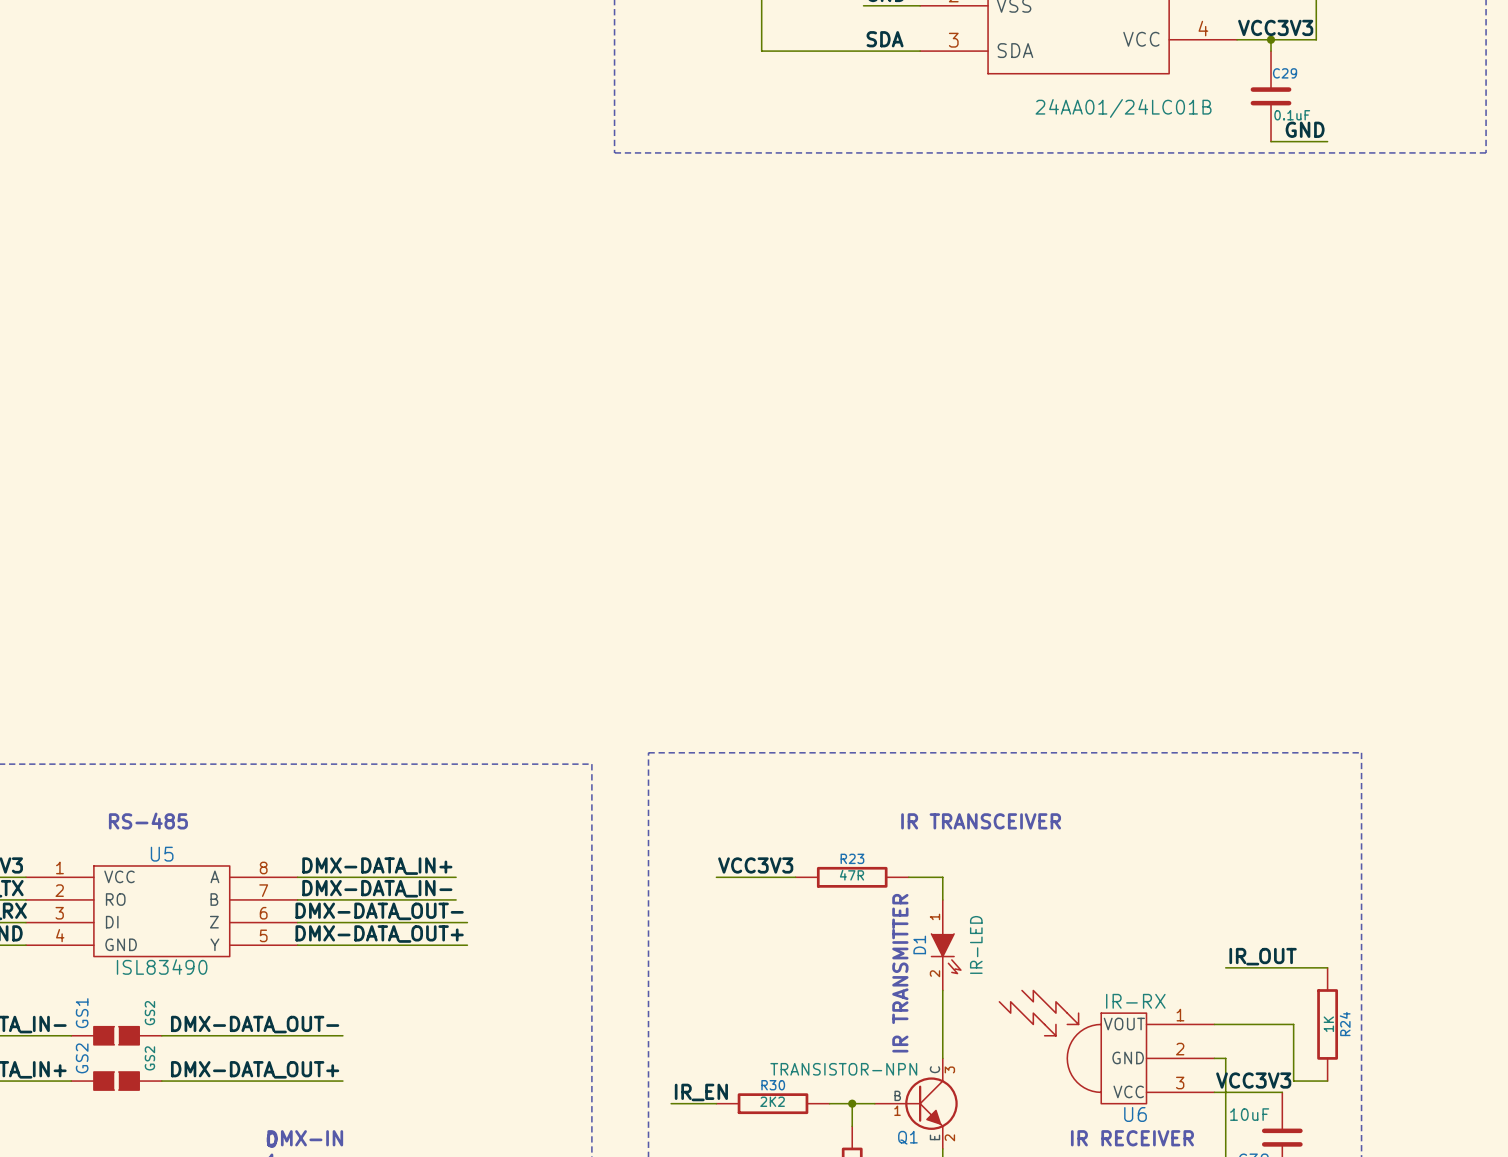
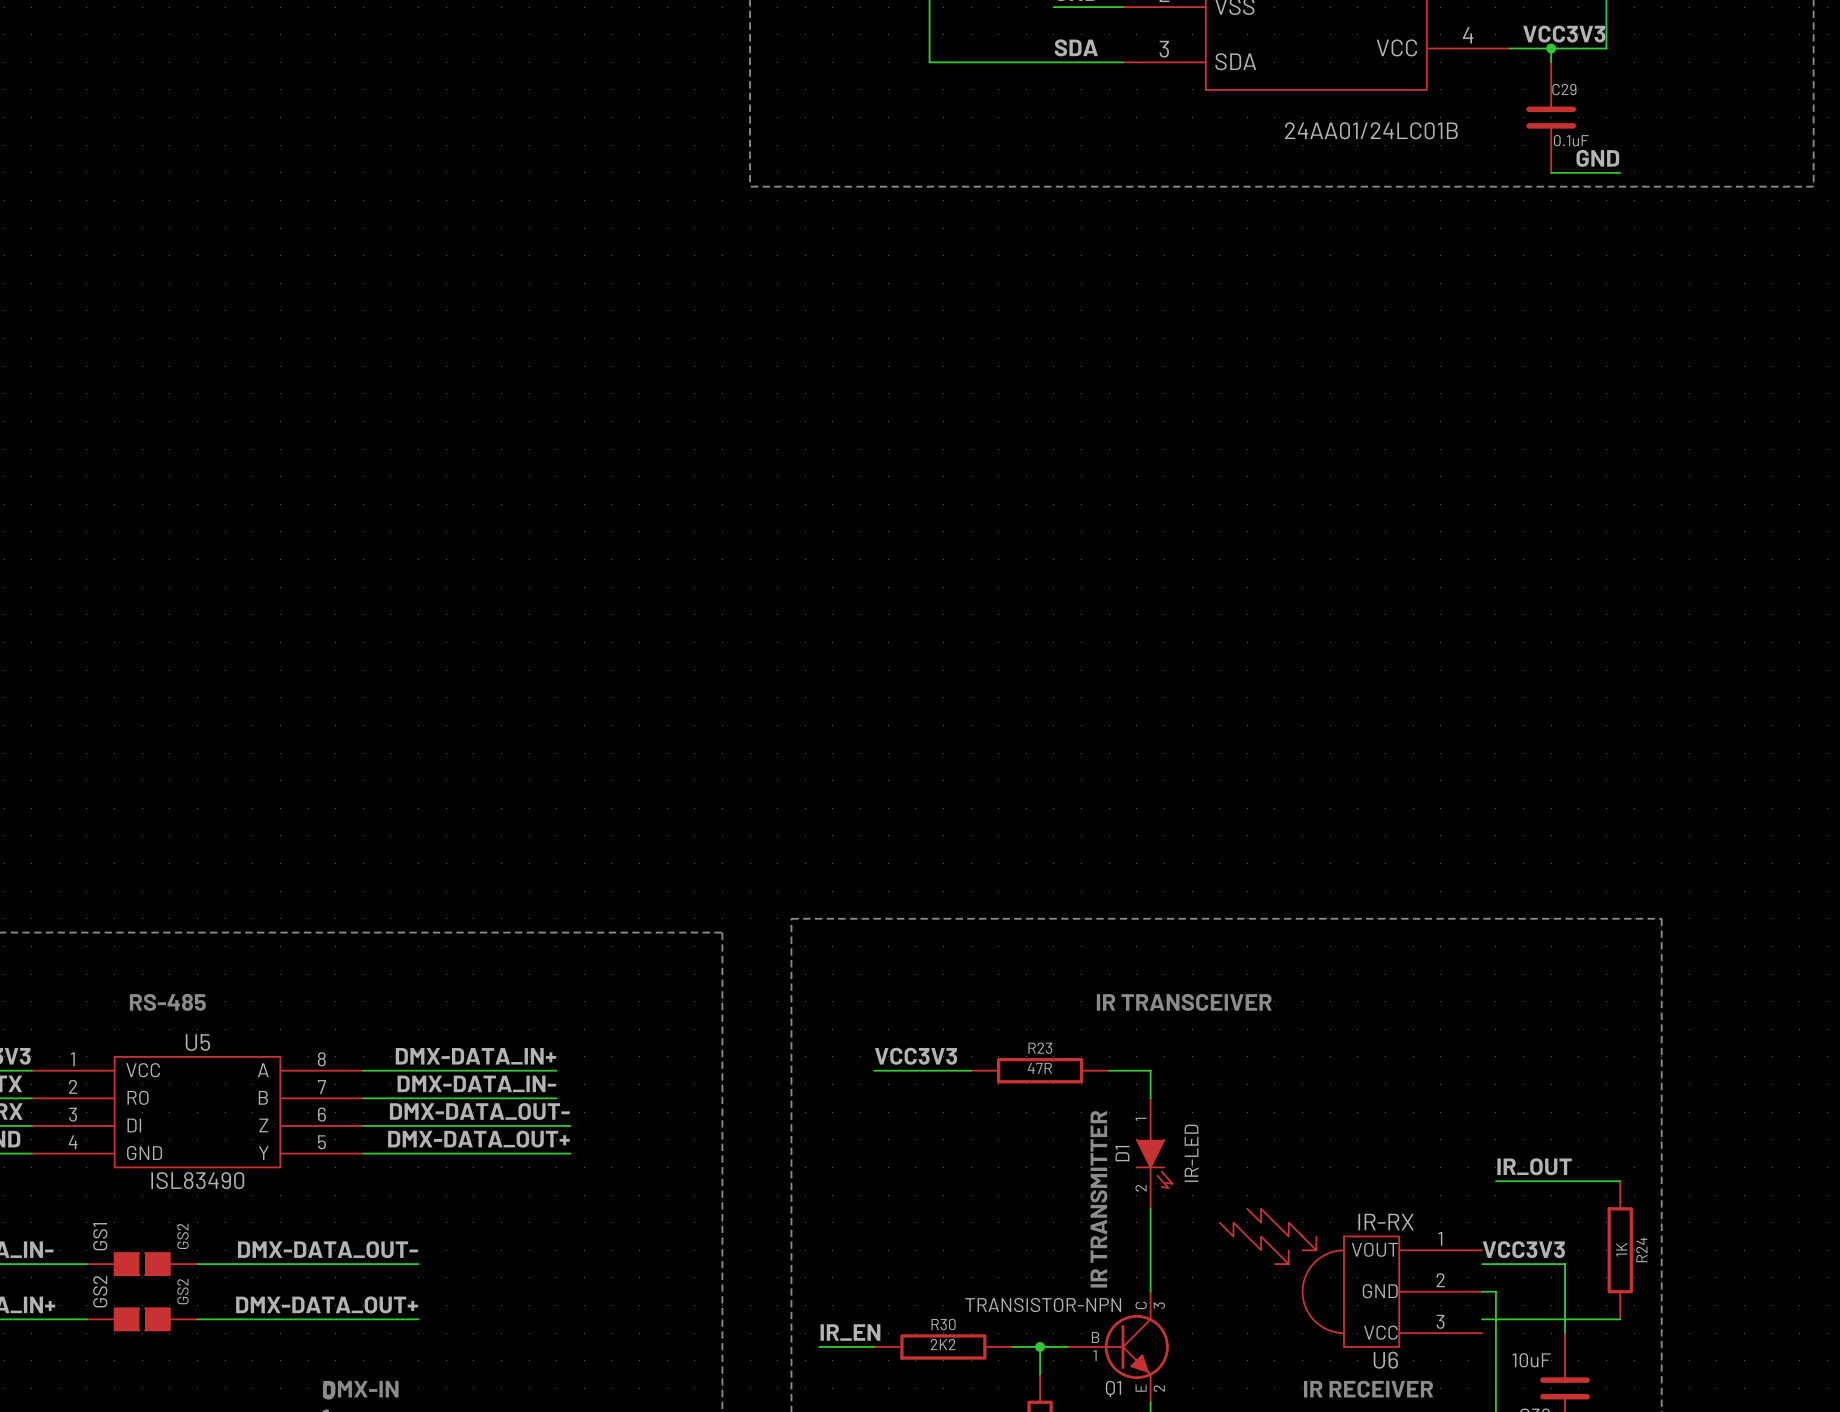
wire: (1214, 1024) (1293, 1024) (1293, 1081) -> (1482, 1319) (1578, 1319)
label position: VCC3V3 (1253, 1080) -> VCC3V3 (1523, 1249)
wire: (1214, 1092) (1282, 1092) -> (1482, 1264) (1565, 1264) (1565, 1333)

